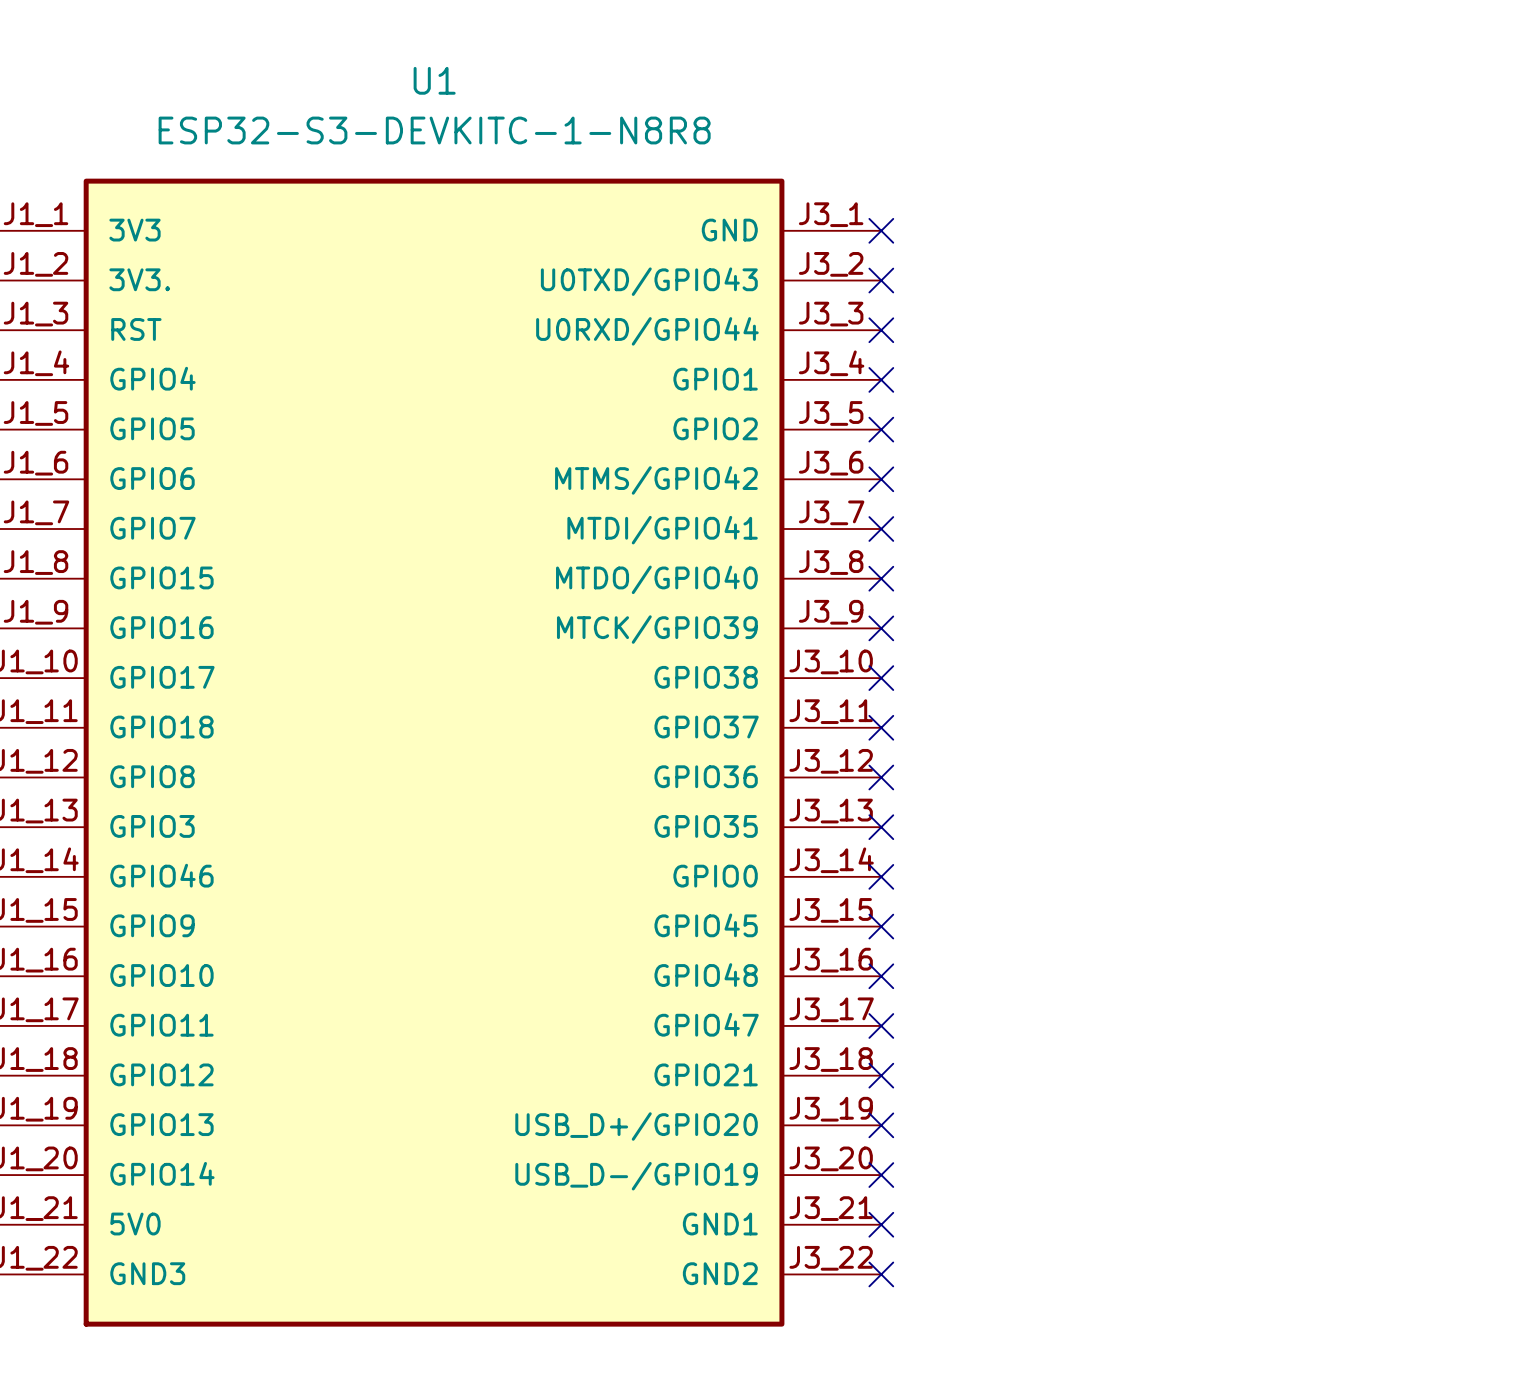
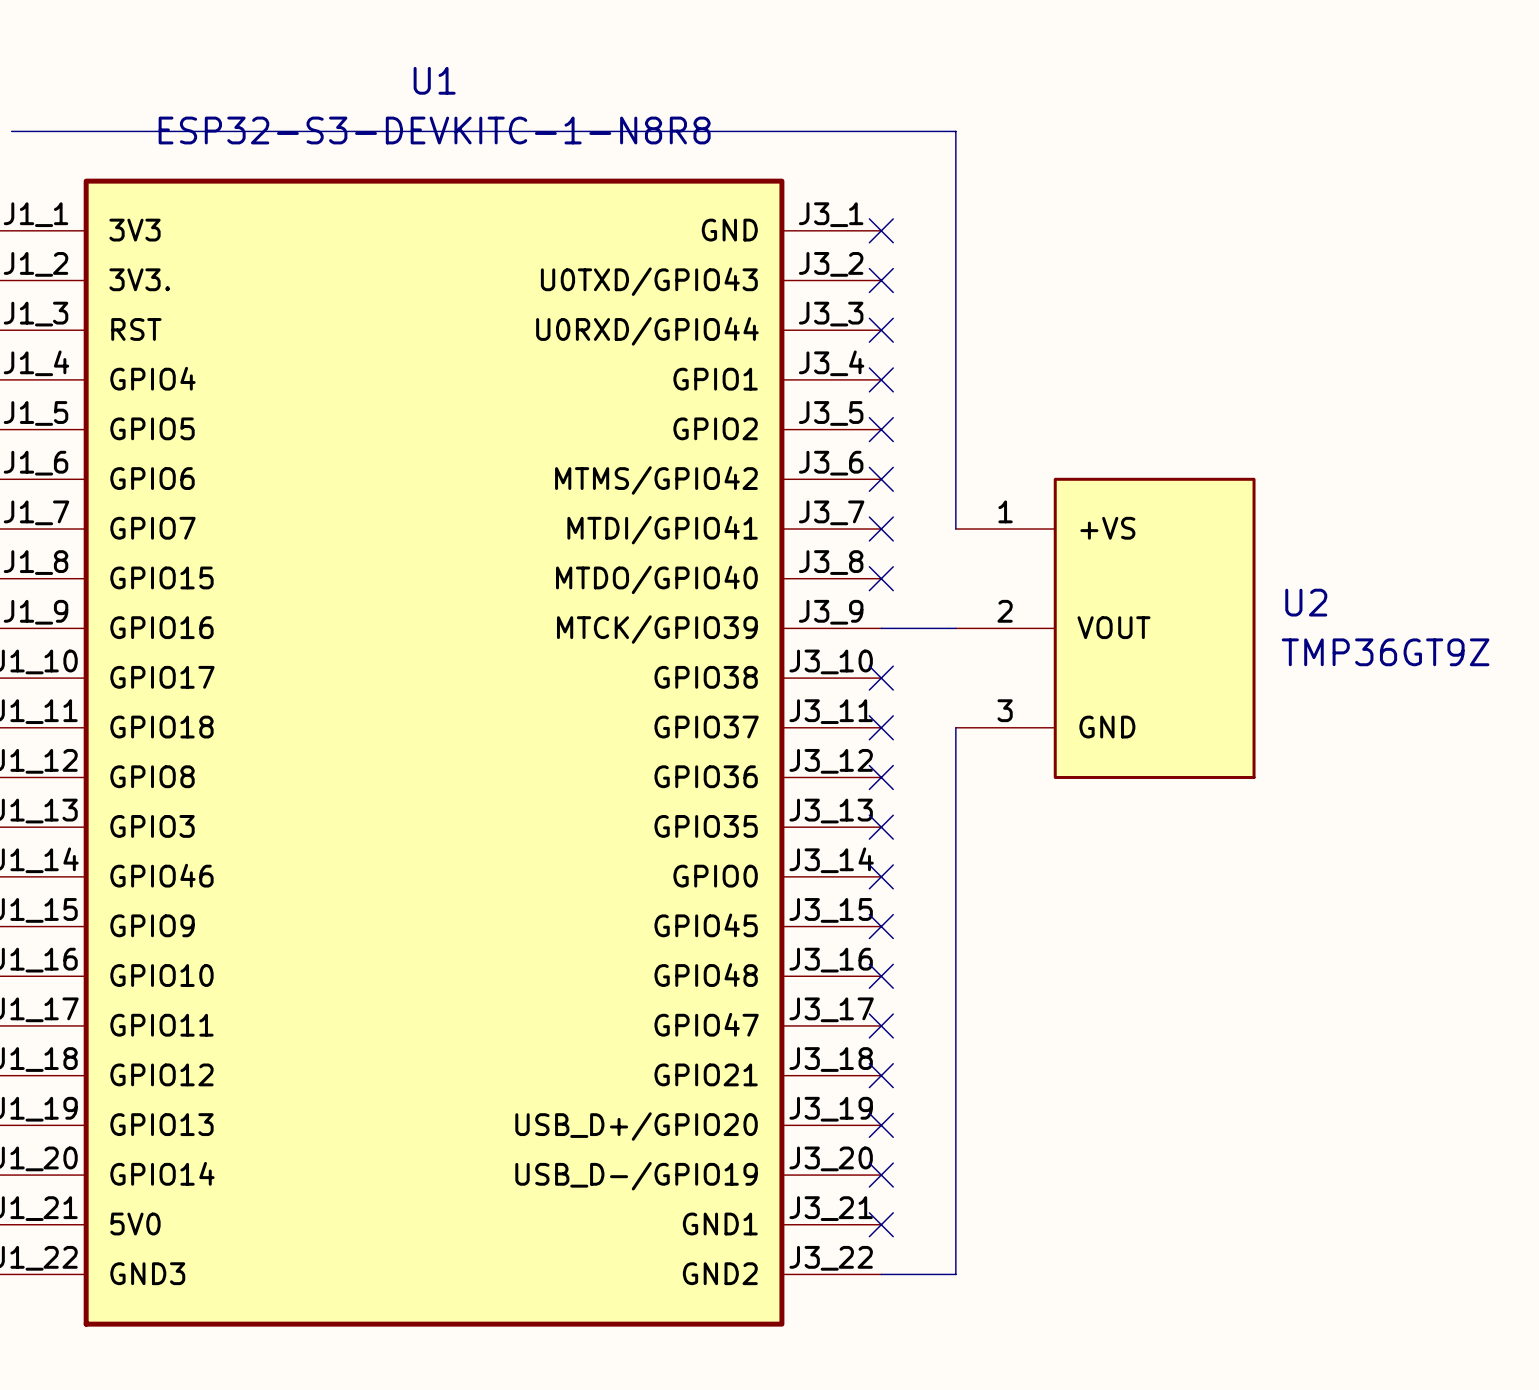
wire: none -> (11, 131) (955, 131) (955, 529)
wire: none -> (881, 628) (955, 628)
no-connect mark: (881, 628) -> none
U2: none -> TMP36GT9Z (1105, 628)
wire: none -> (955, 727) (955, 1274) (881, 1274)
no-connect mark: (881, 1274) -> none

